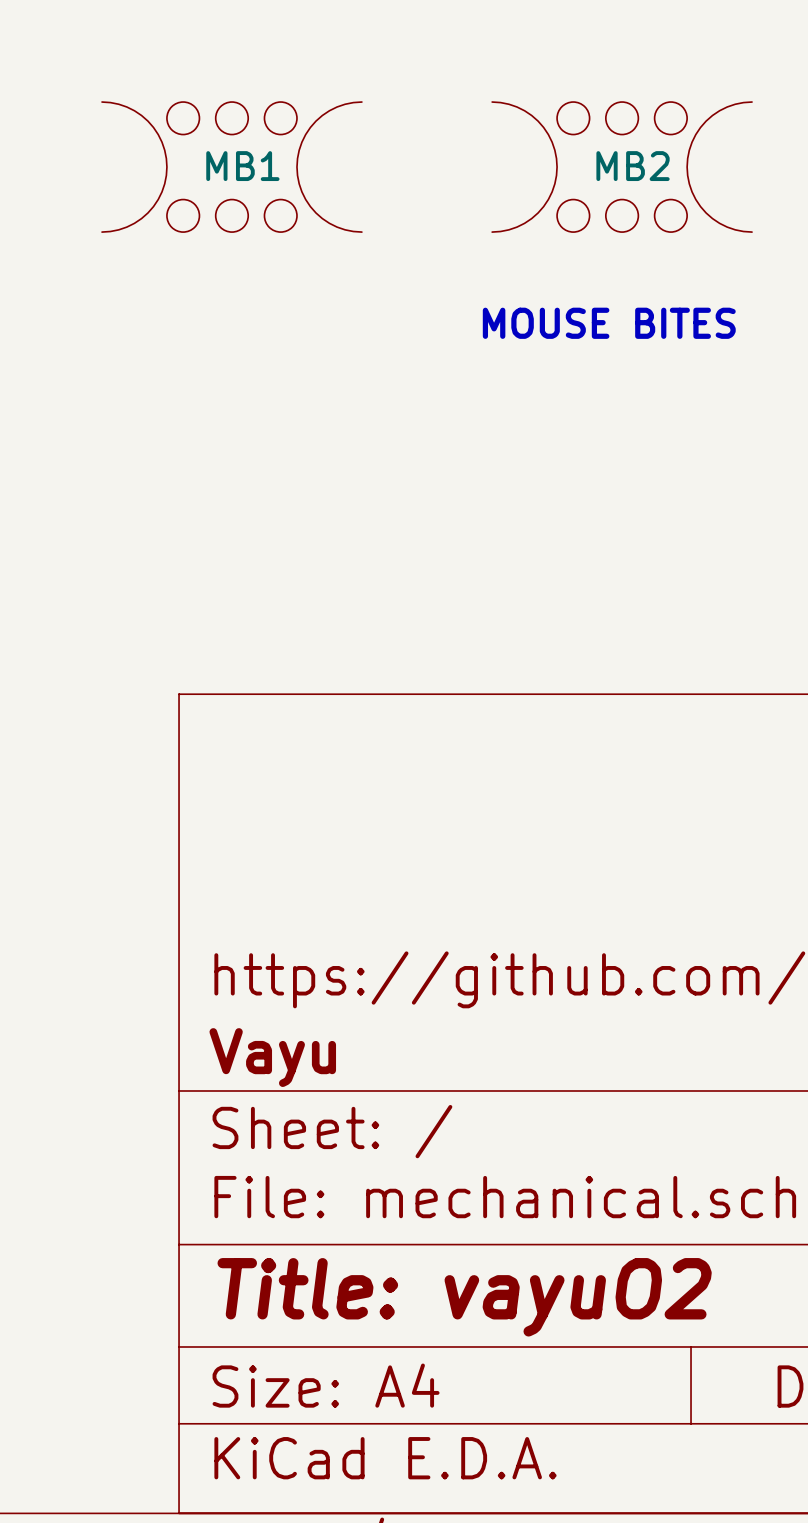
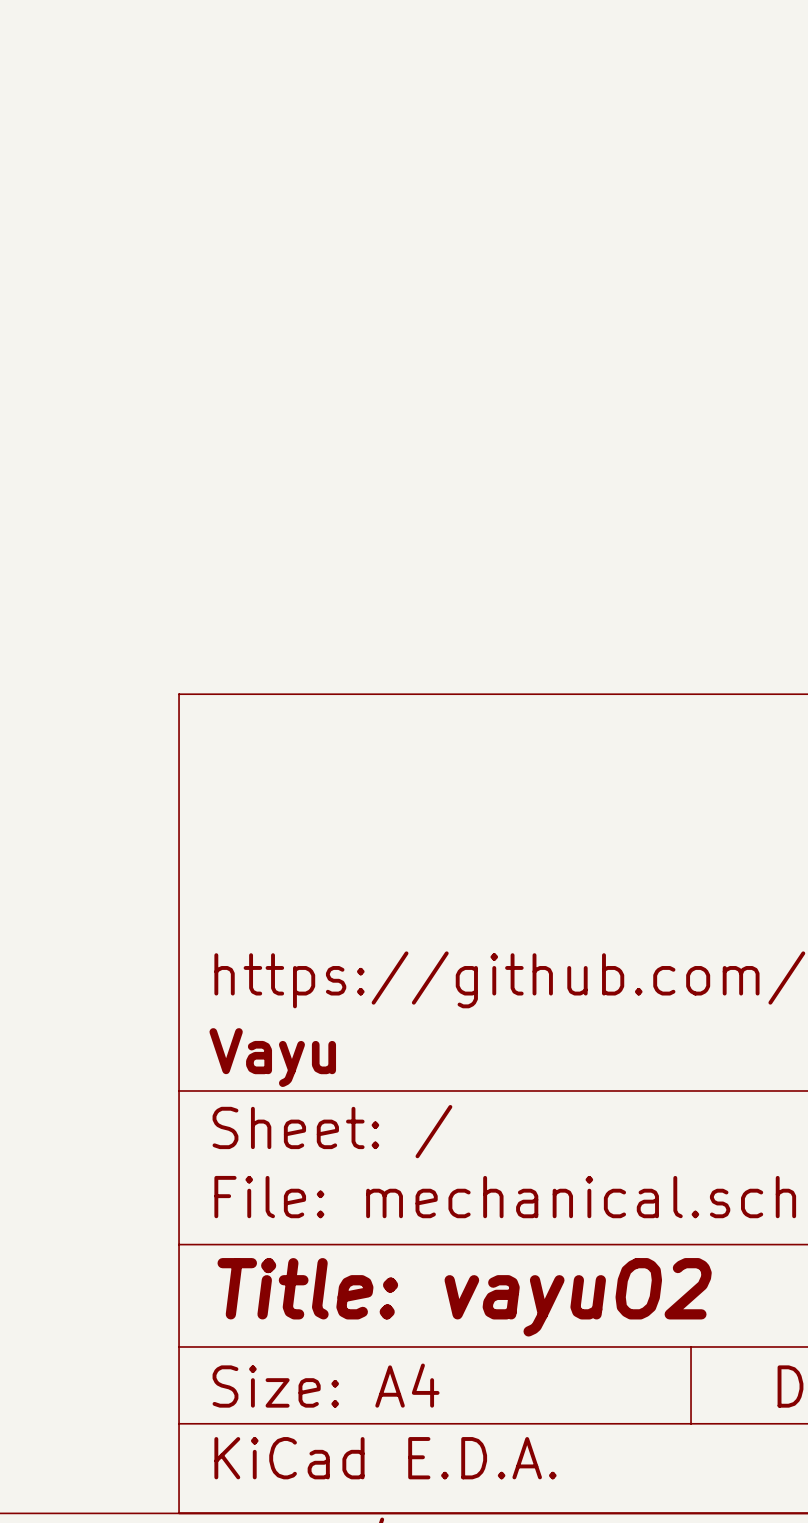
MB1: (231, 167) -> none
MB2: (622, 167) -> none
text: MOUSE BITES (609, 323) -> none

